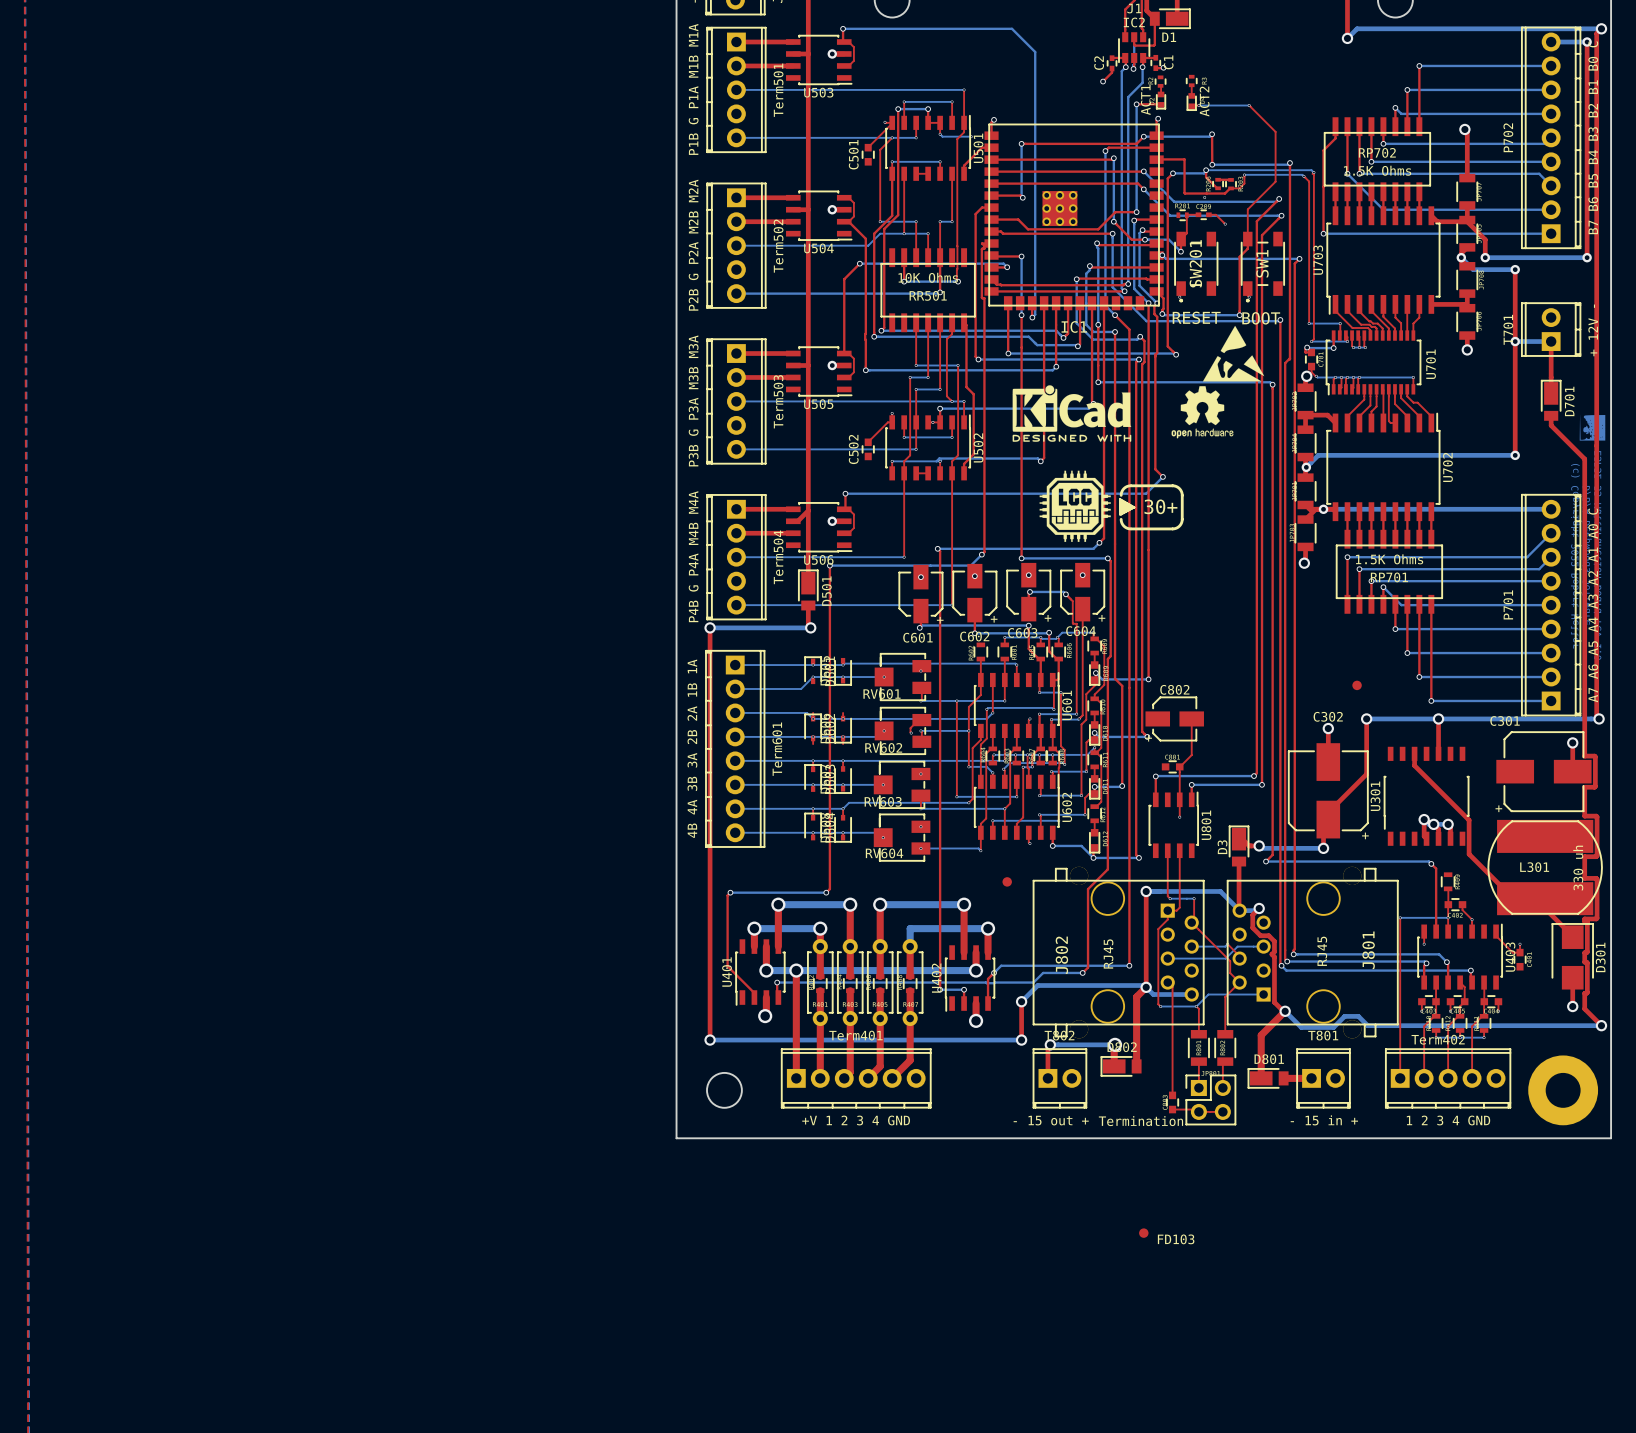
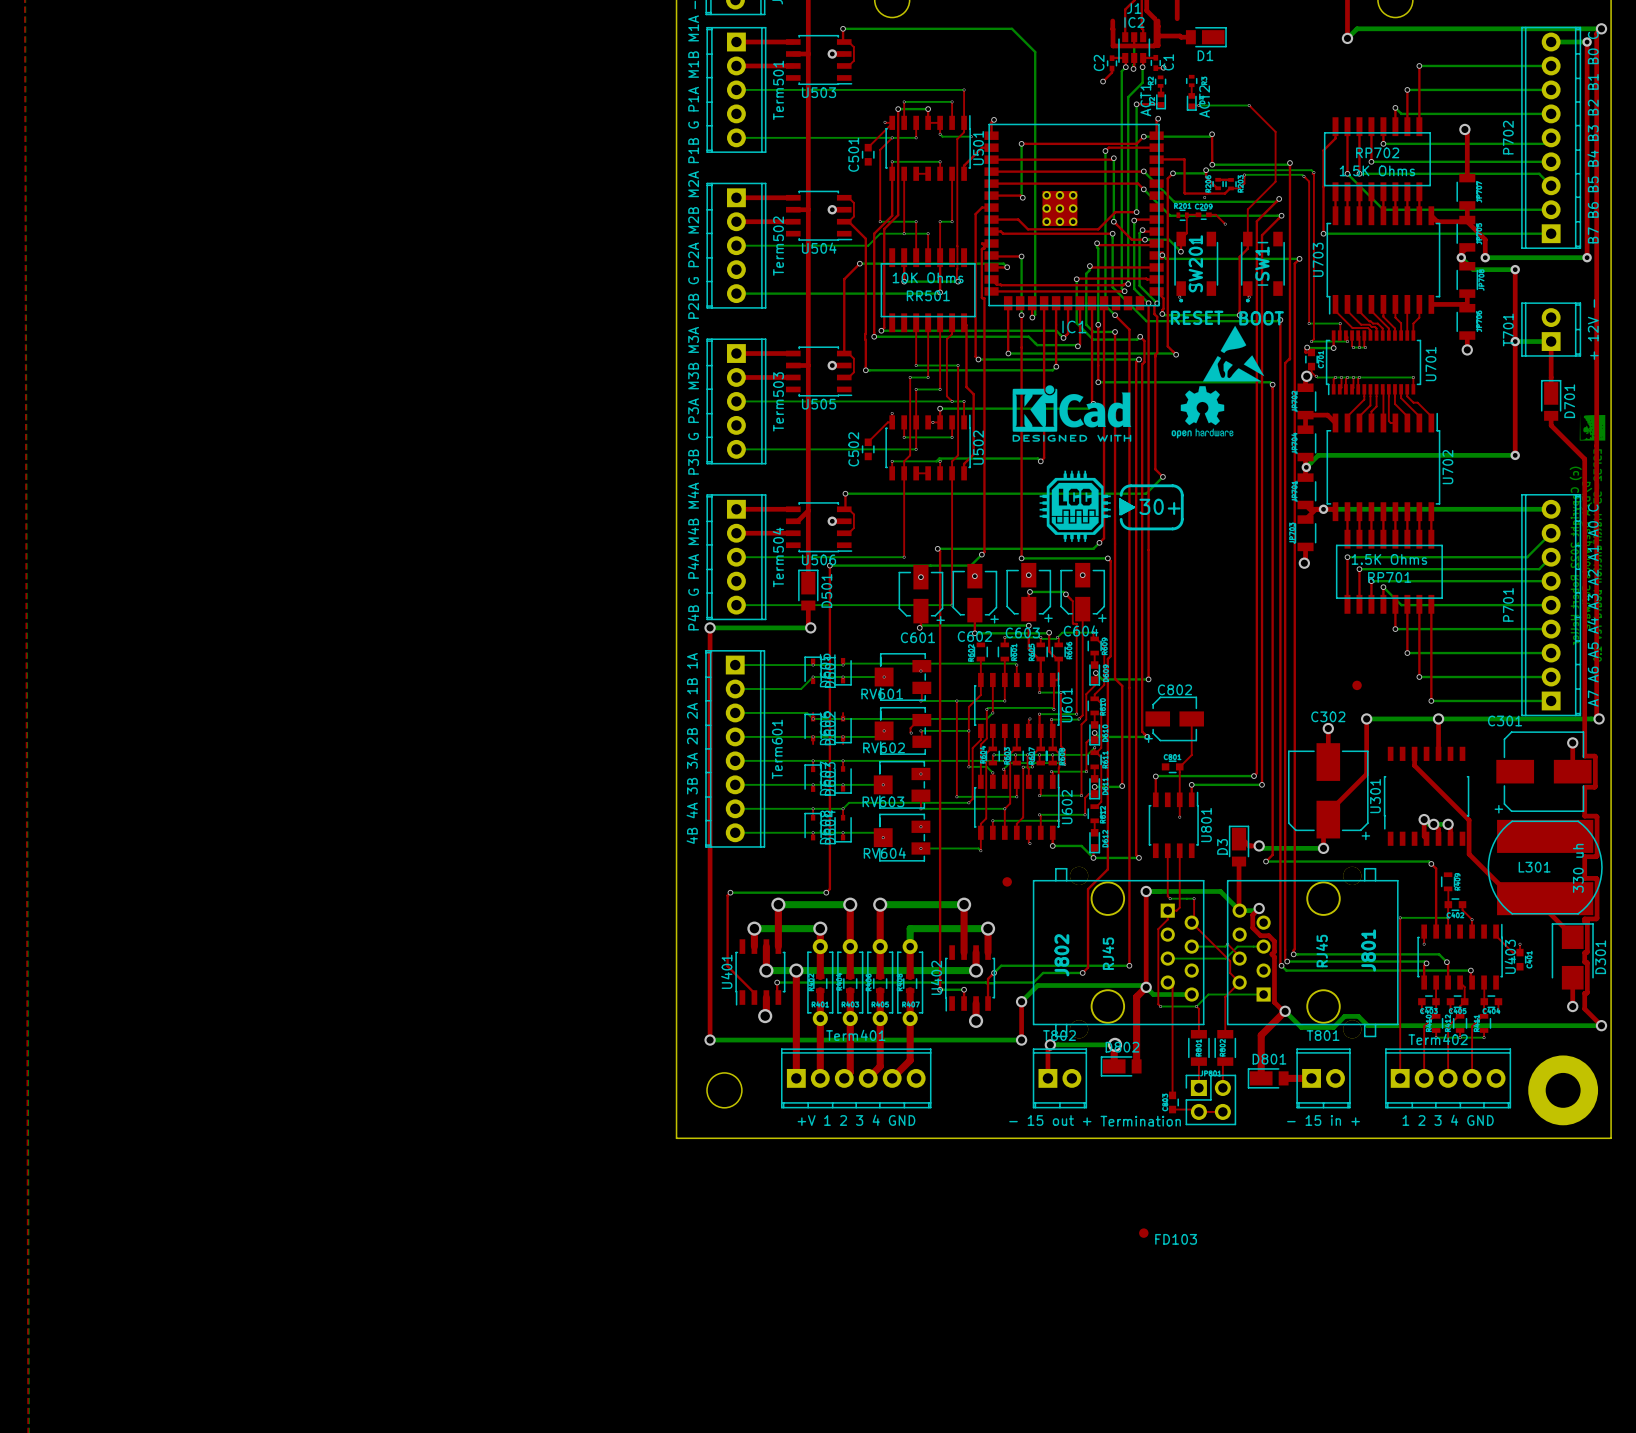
D1 position: (1170, 18) -> (1206, 37)
top track: none -> (1112, 20) (1113, 45) (1158, 45) (1158, 20)
top track: none -> (1158, 36) (1190, 37)

